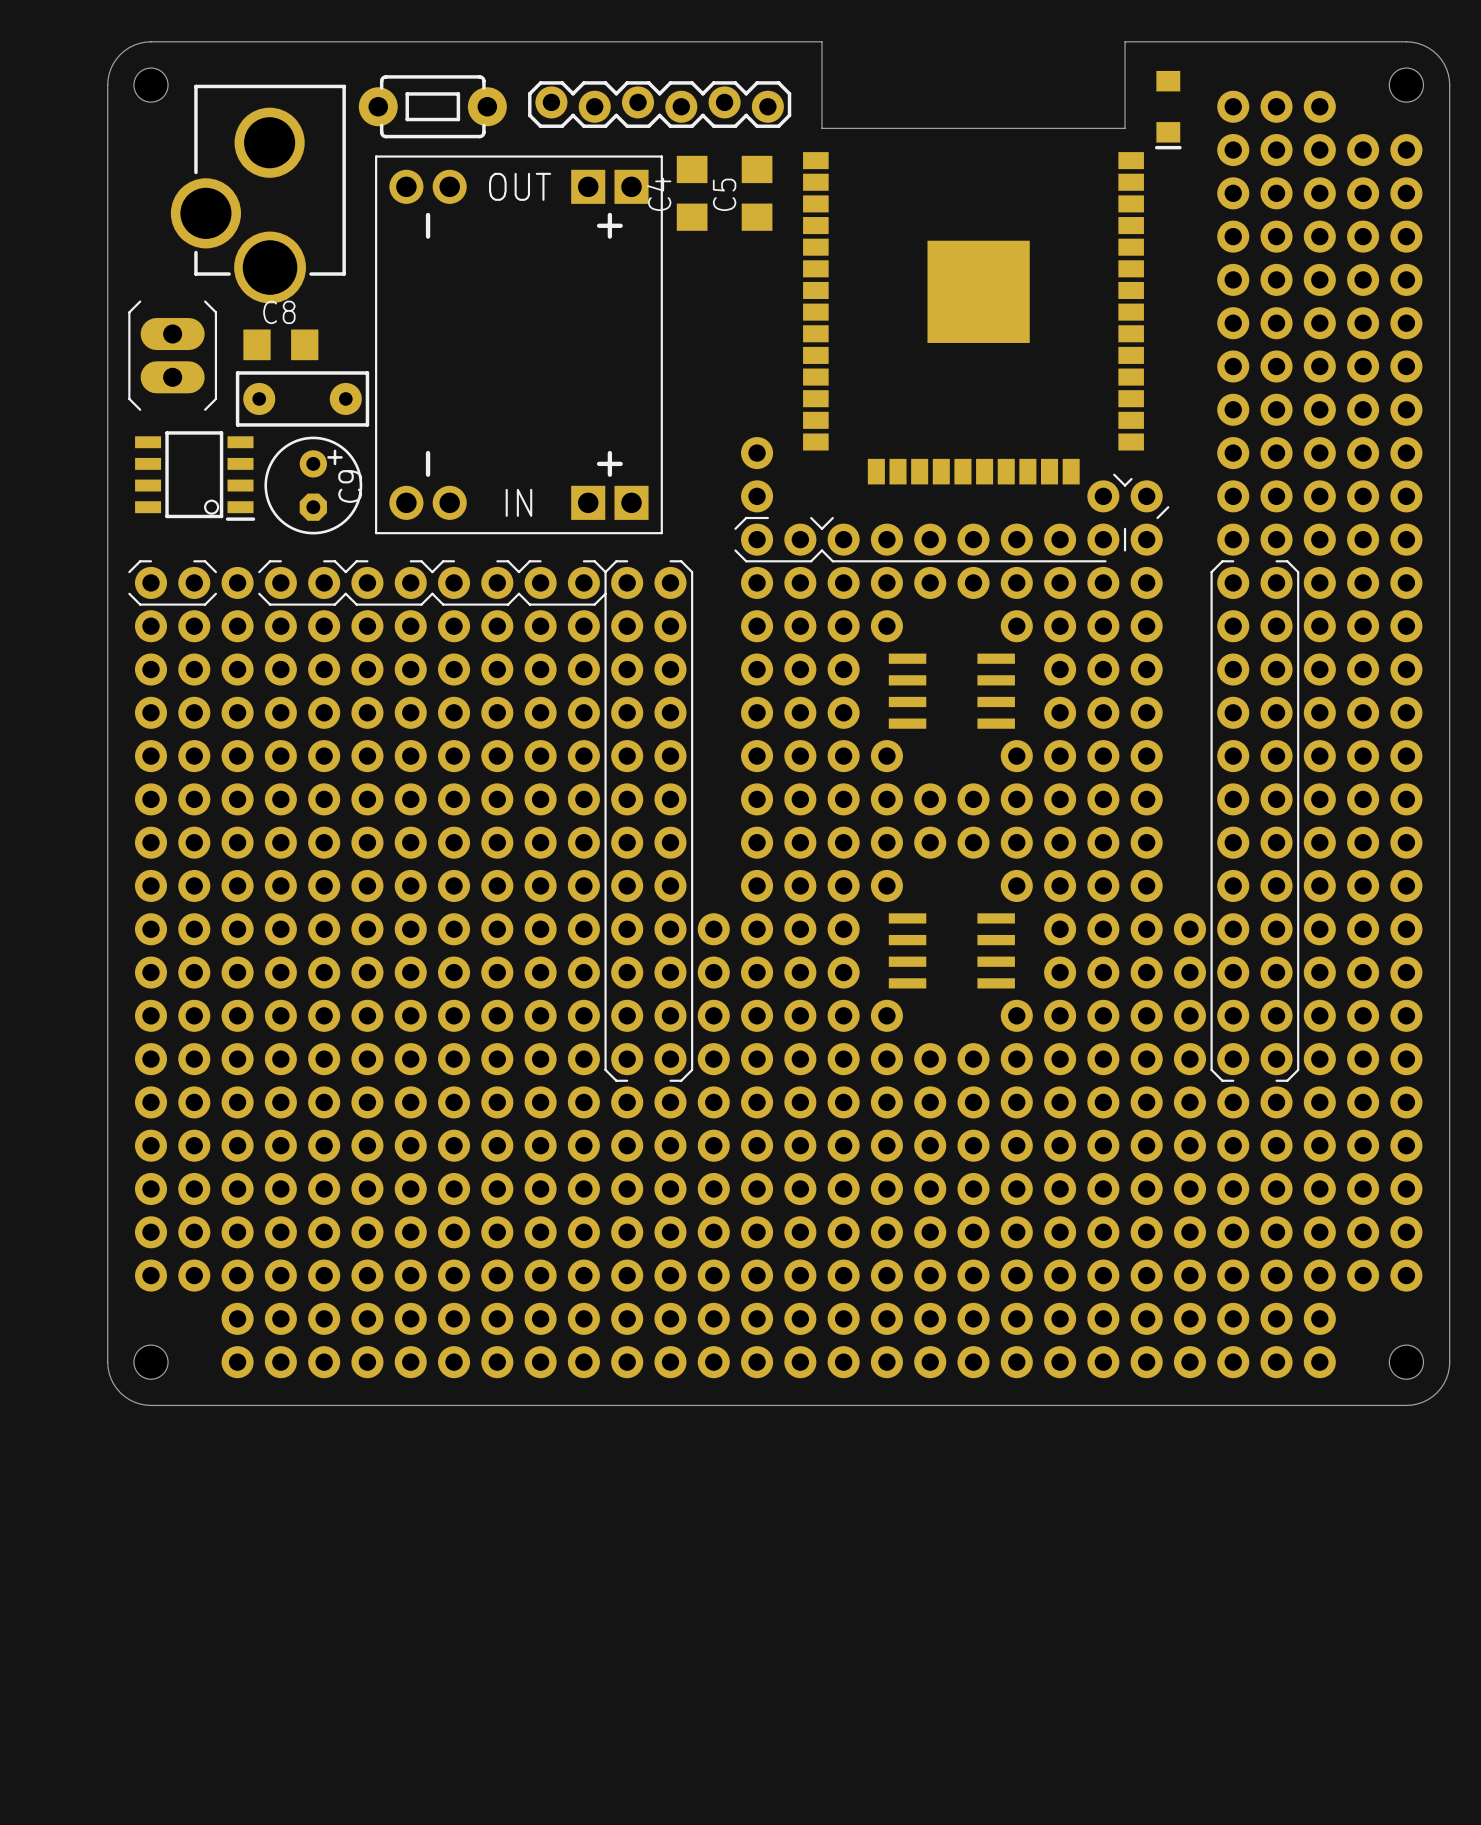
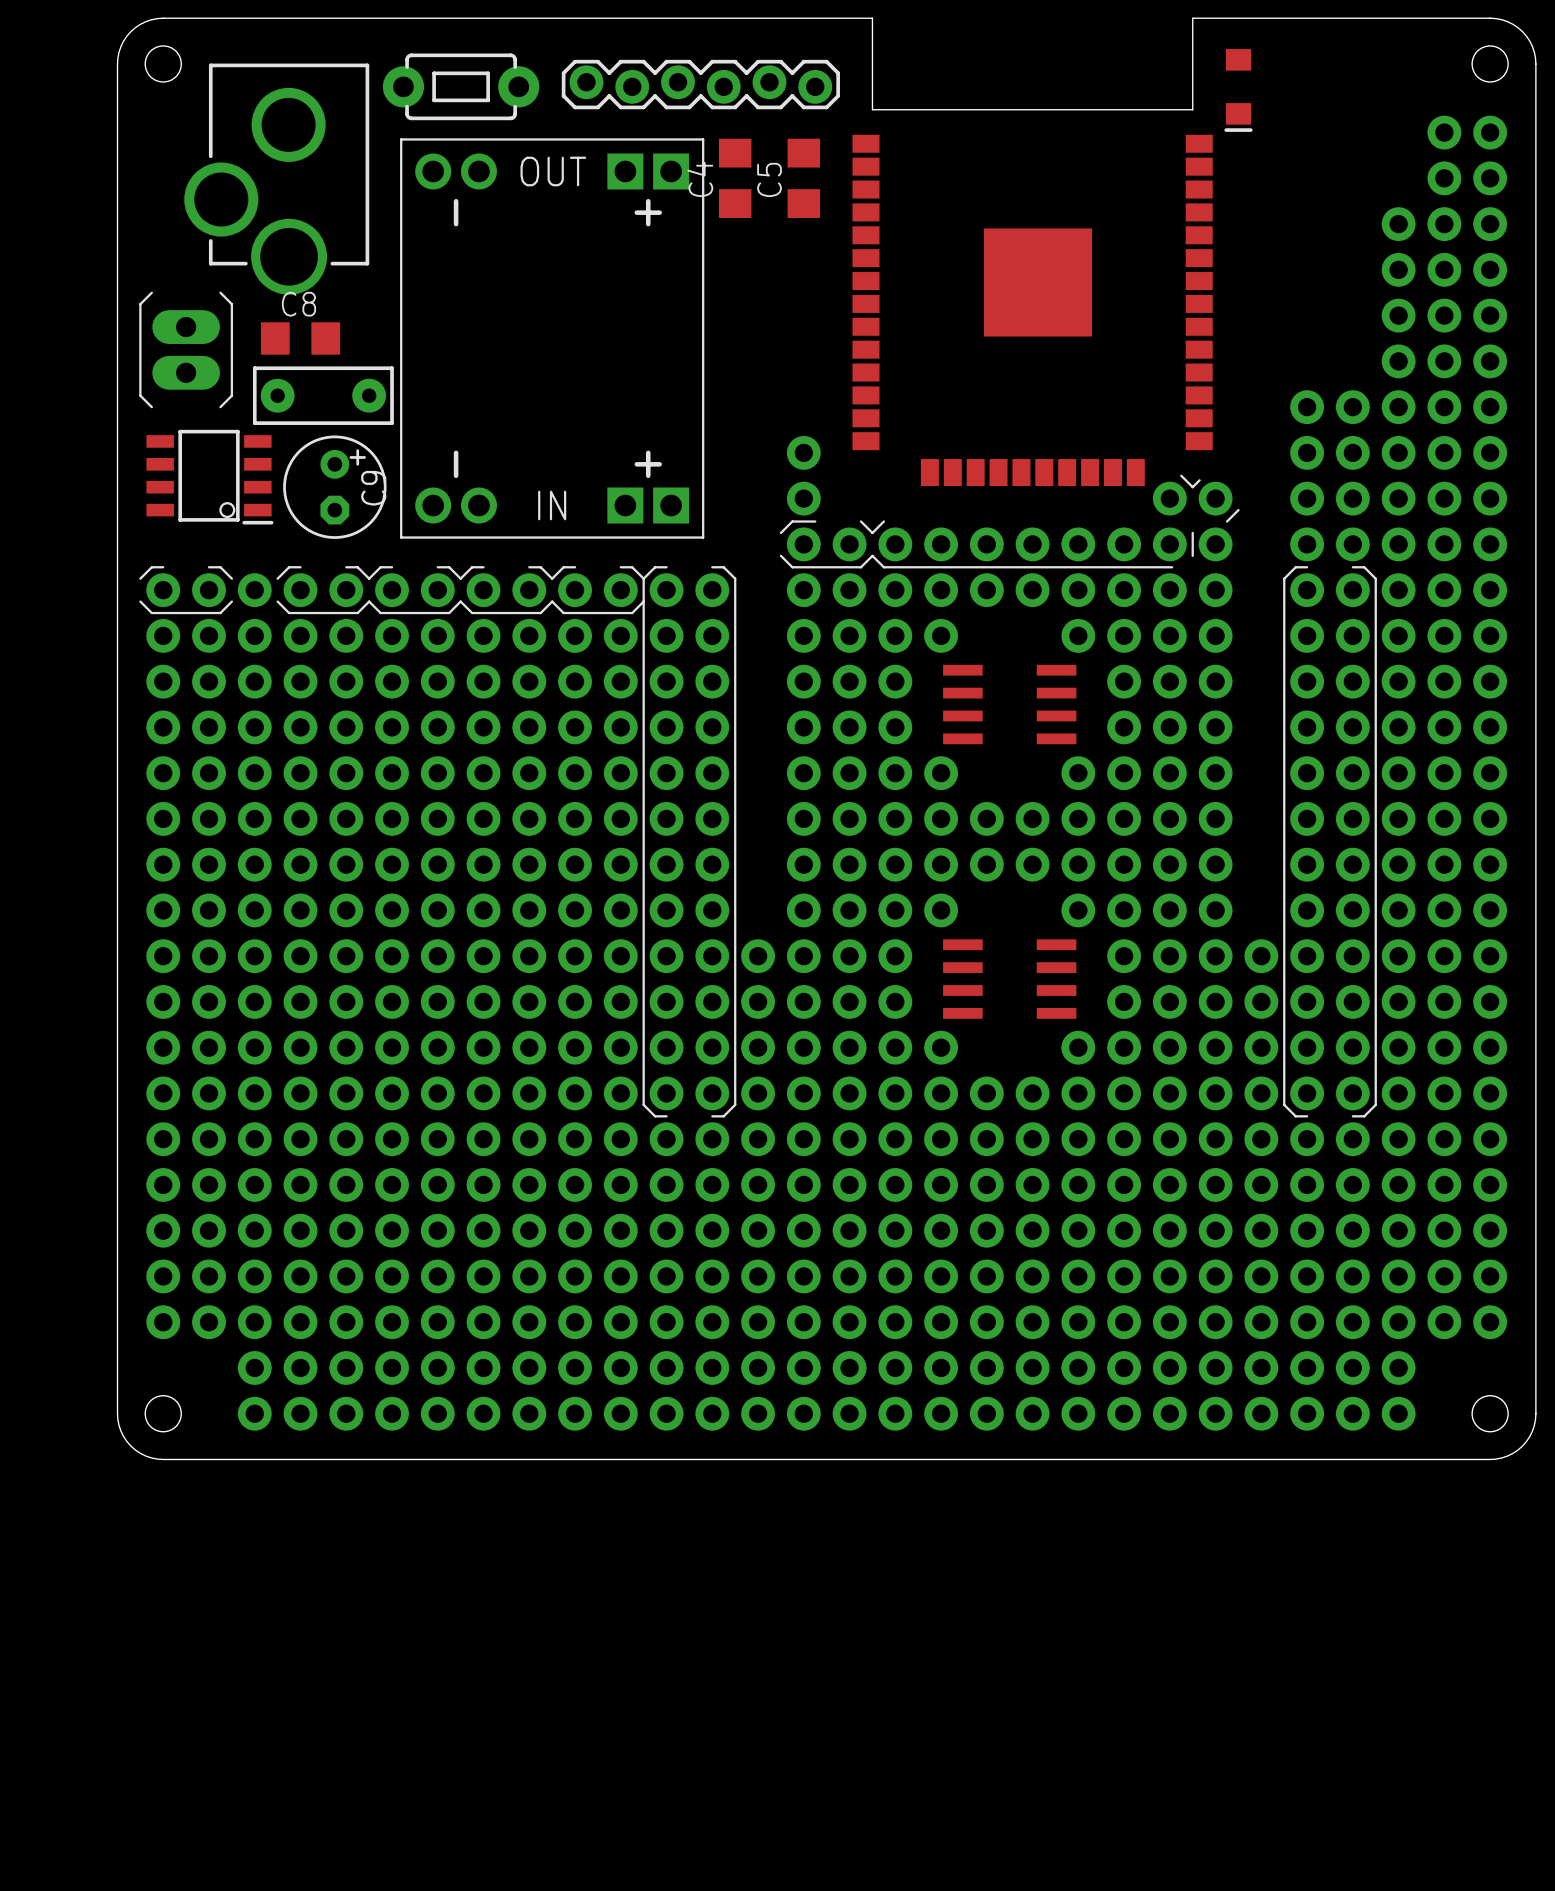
part position: (1233, 236) -> (1398, 361)
part: (1319, 301) -> none
part: (1276, 323) -> none

